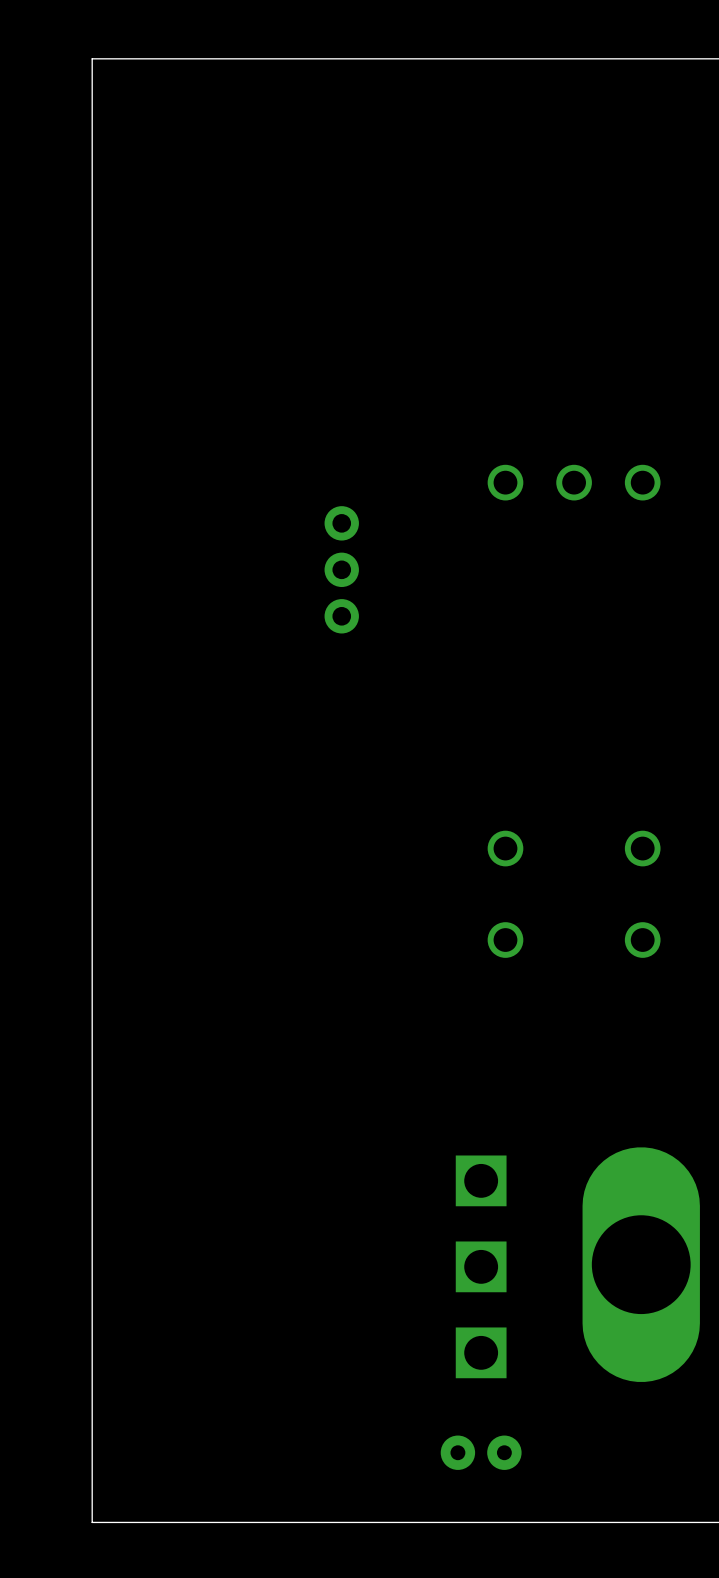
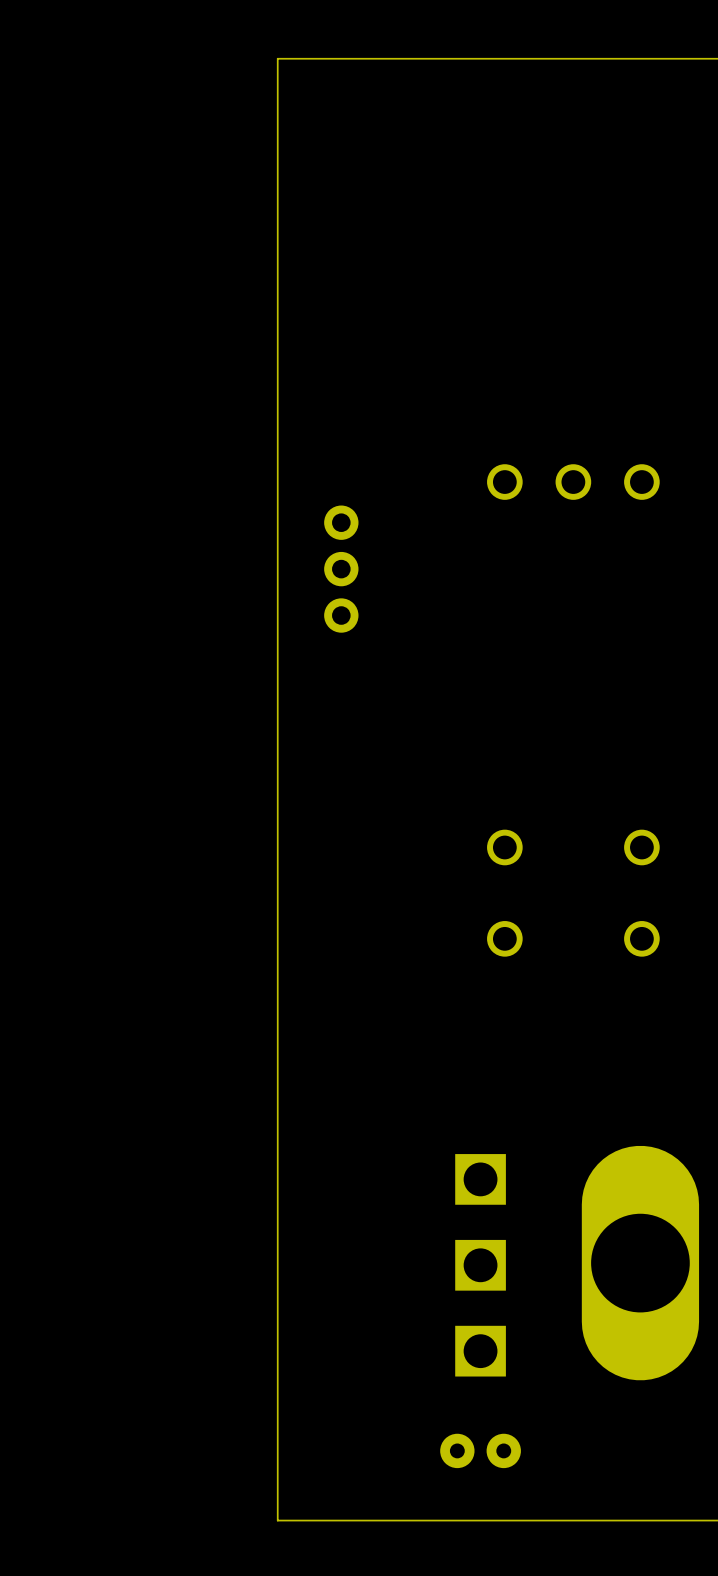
board edge: (278, 58) (92, 58) (92, 1522) (278, 1522) -> (277, 58) (277, 1520)

